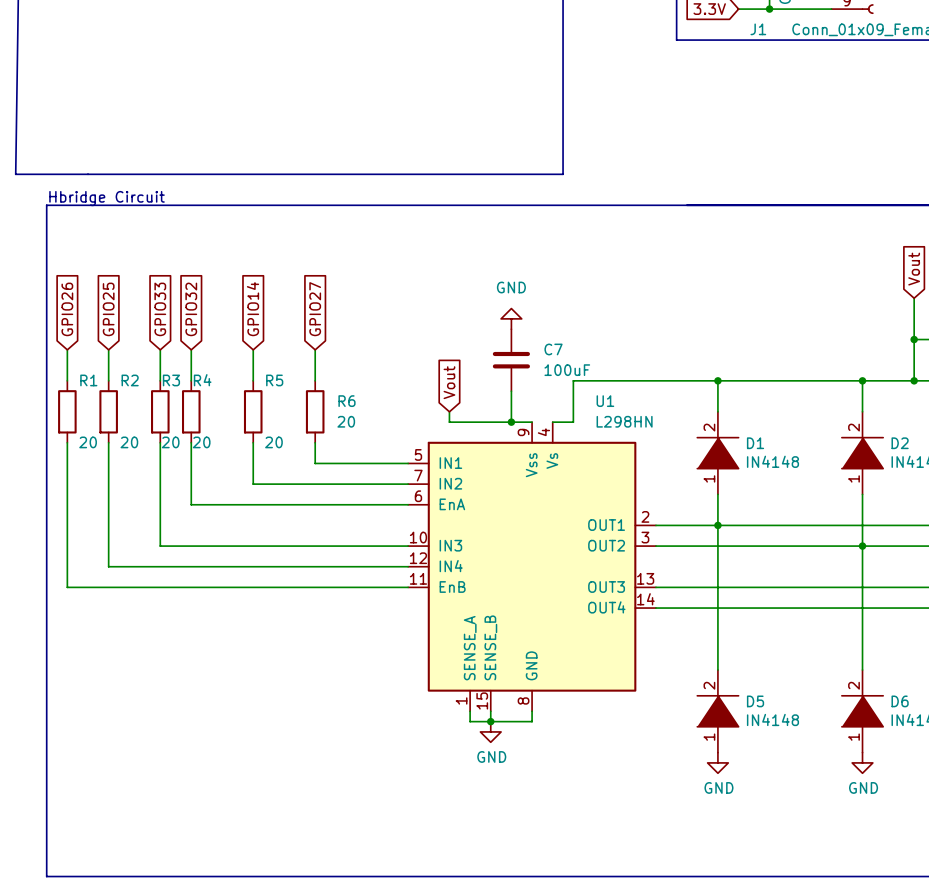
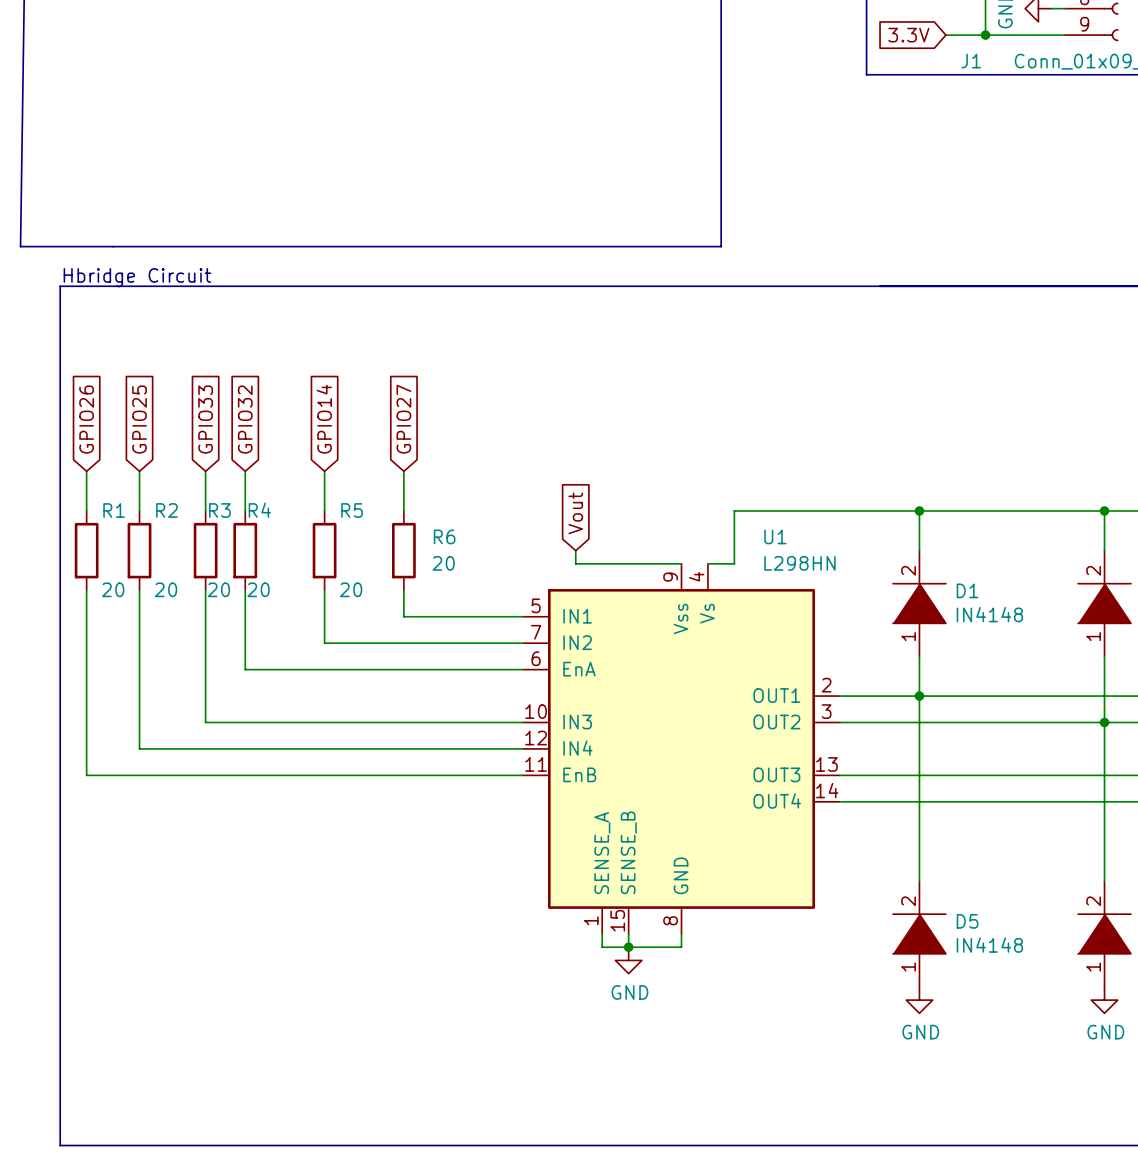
power symbol: GND (511, 318) -> none
C7: 100uF (511, 360) -> none
wire: (511, 391) (511, 422) -> none
junction: (511, 422) -> none

